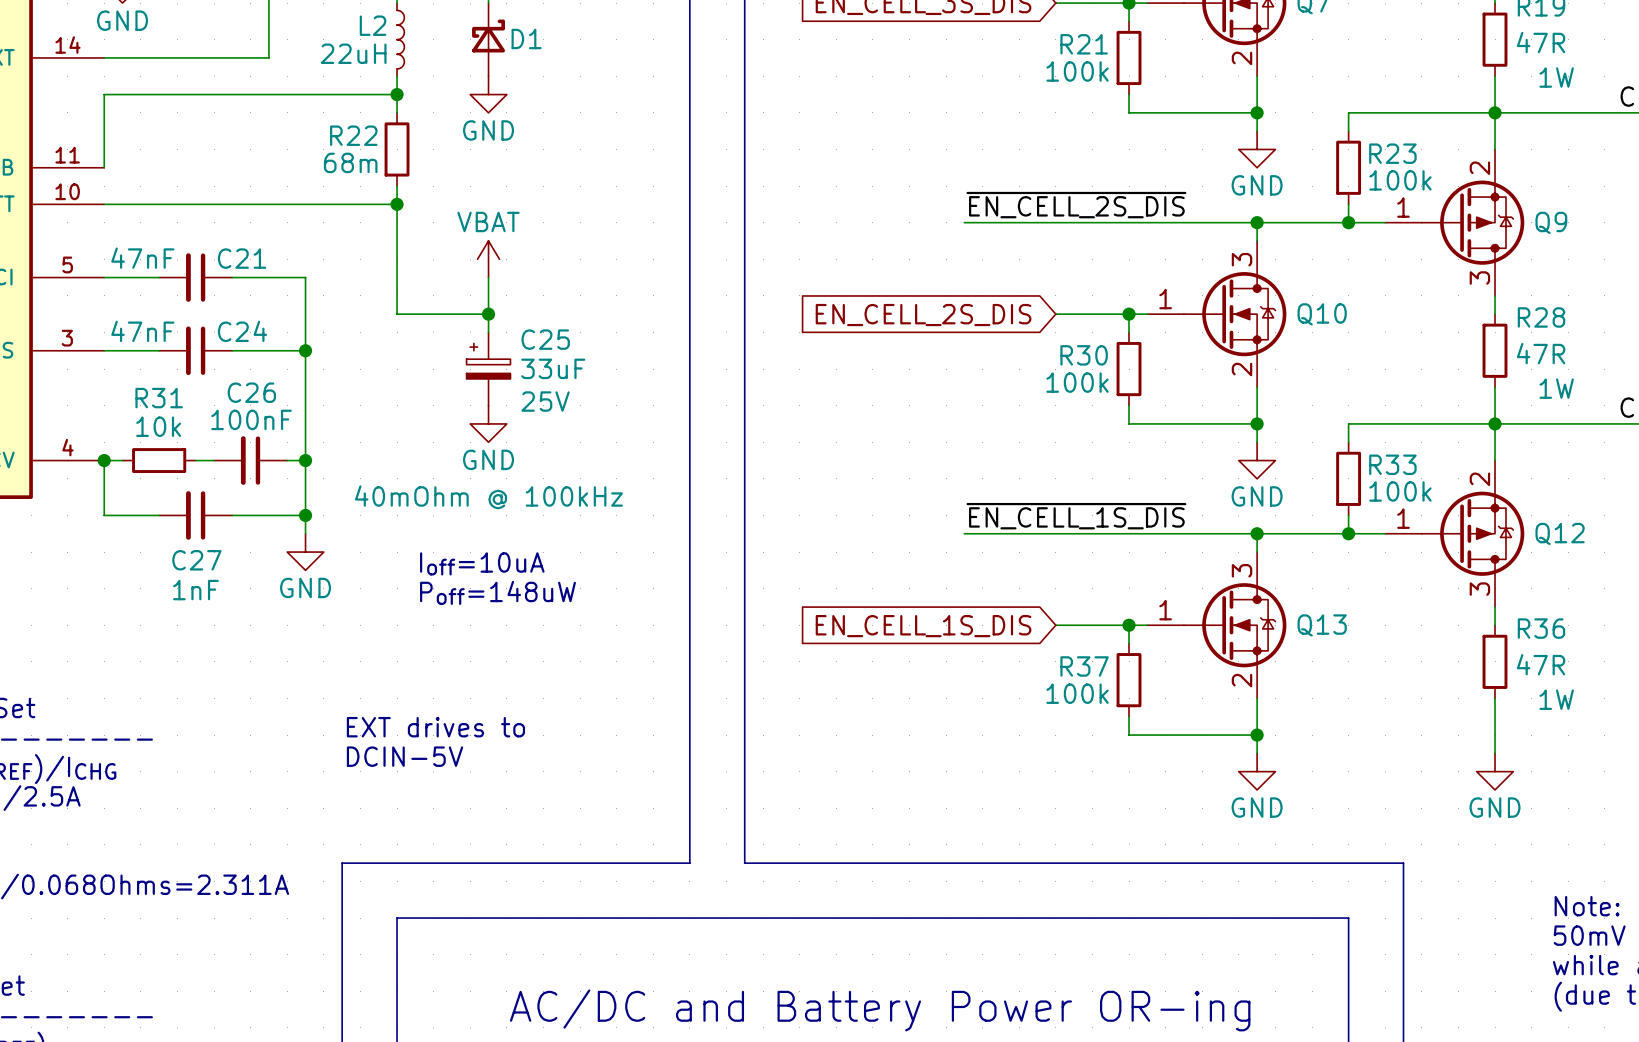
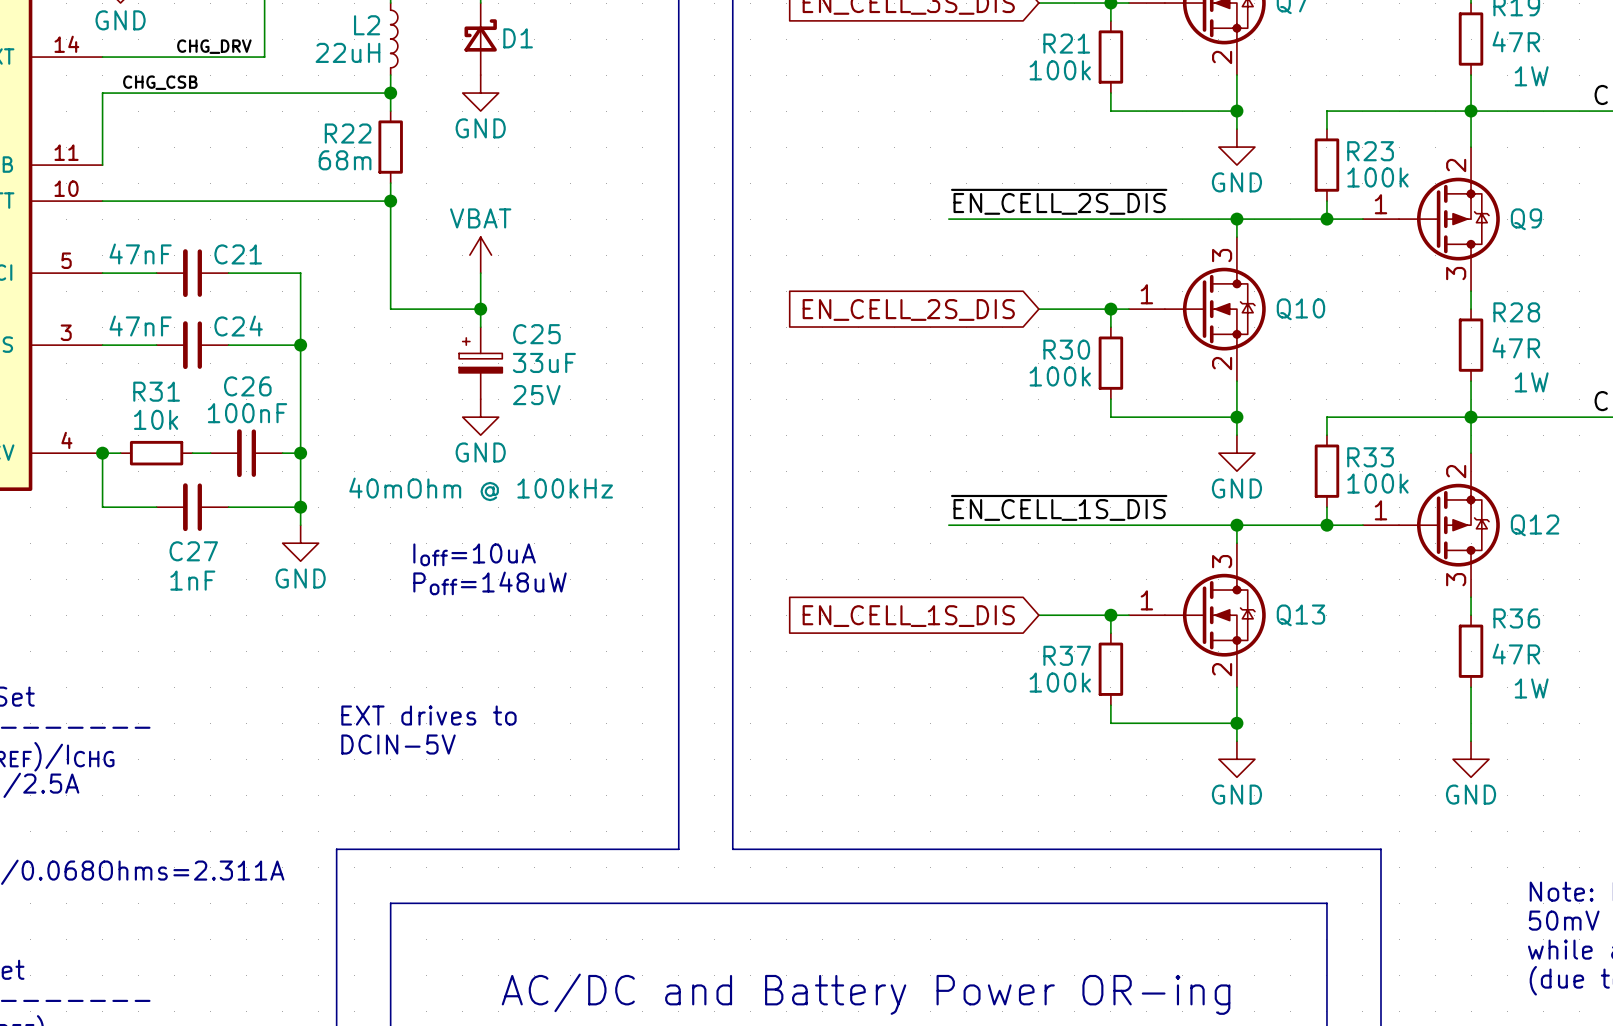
label: none -> CHG_DRV (214, 46)
label: none -> CHG_CSB (160, 82)

